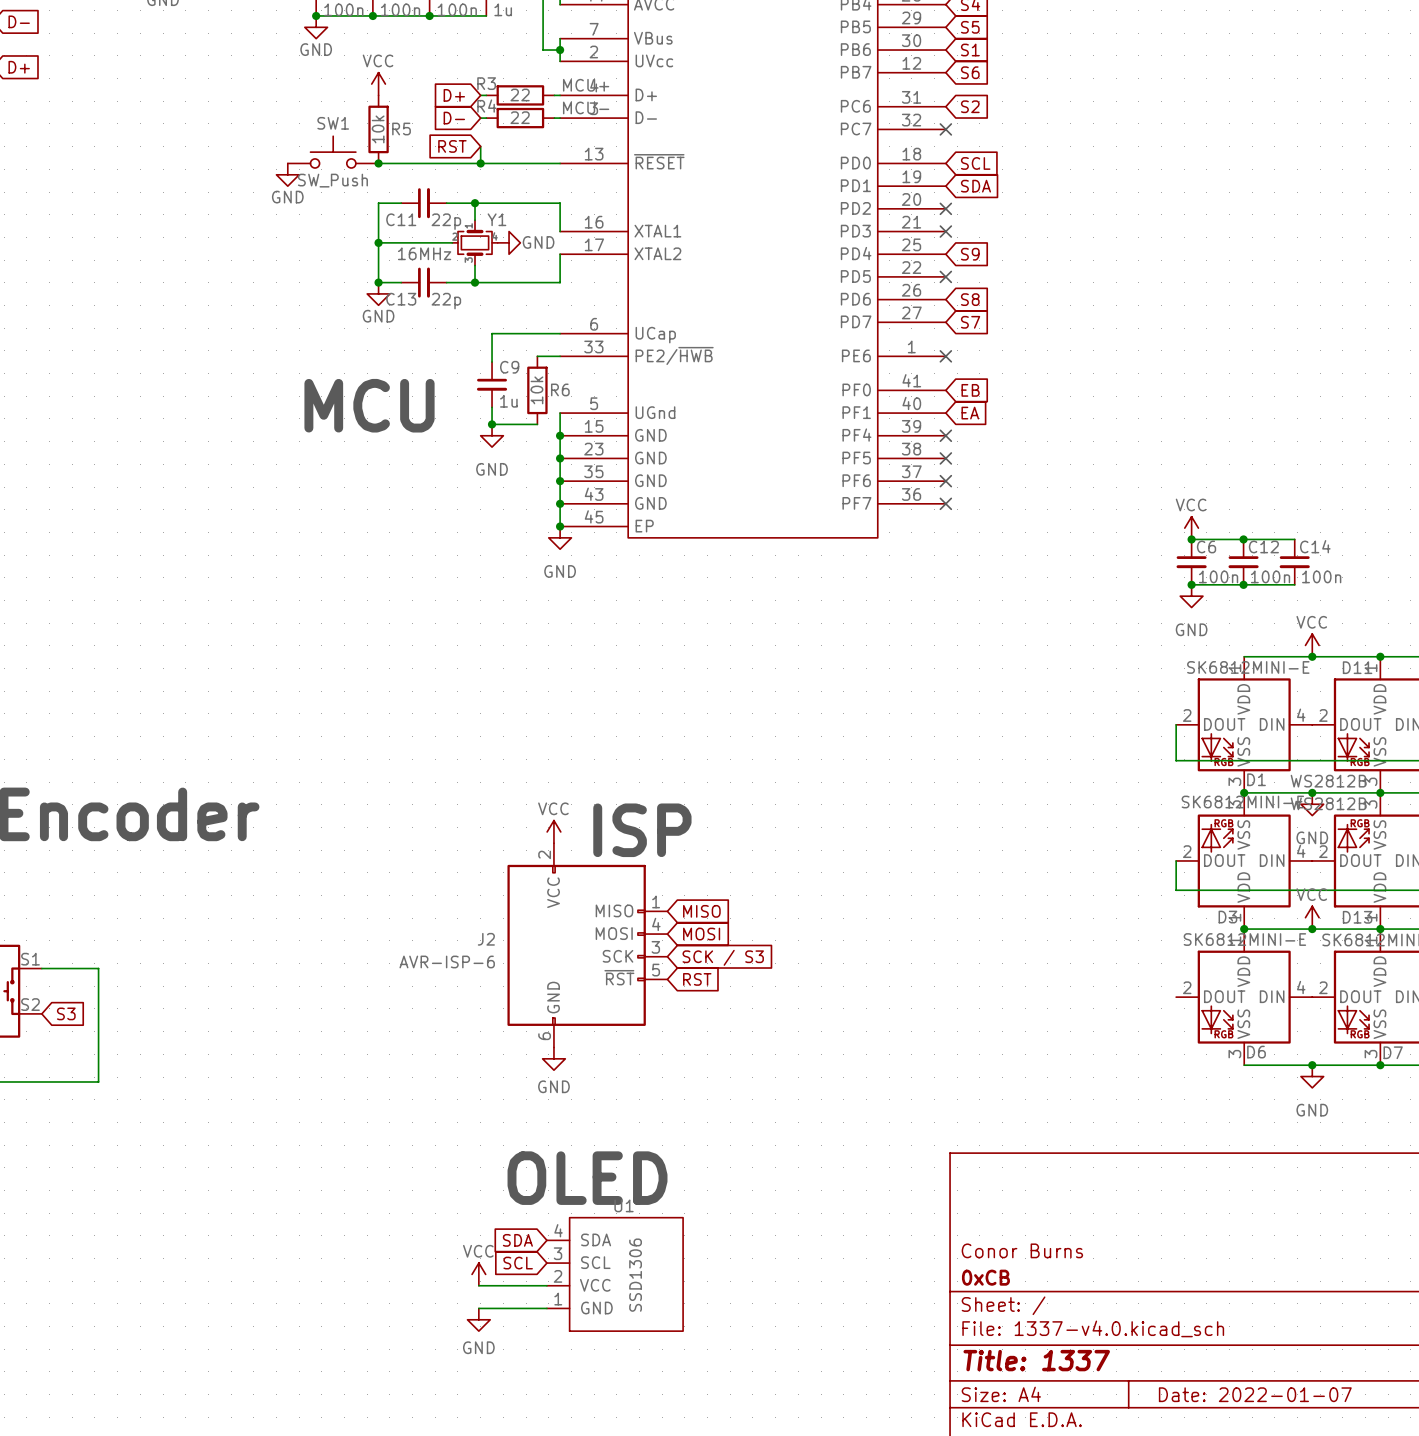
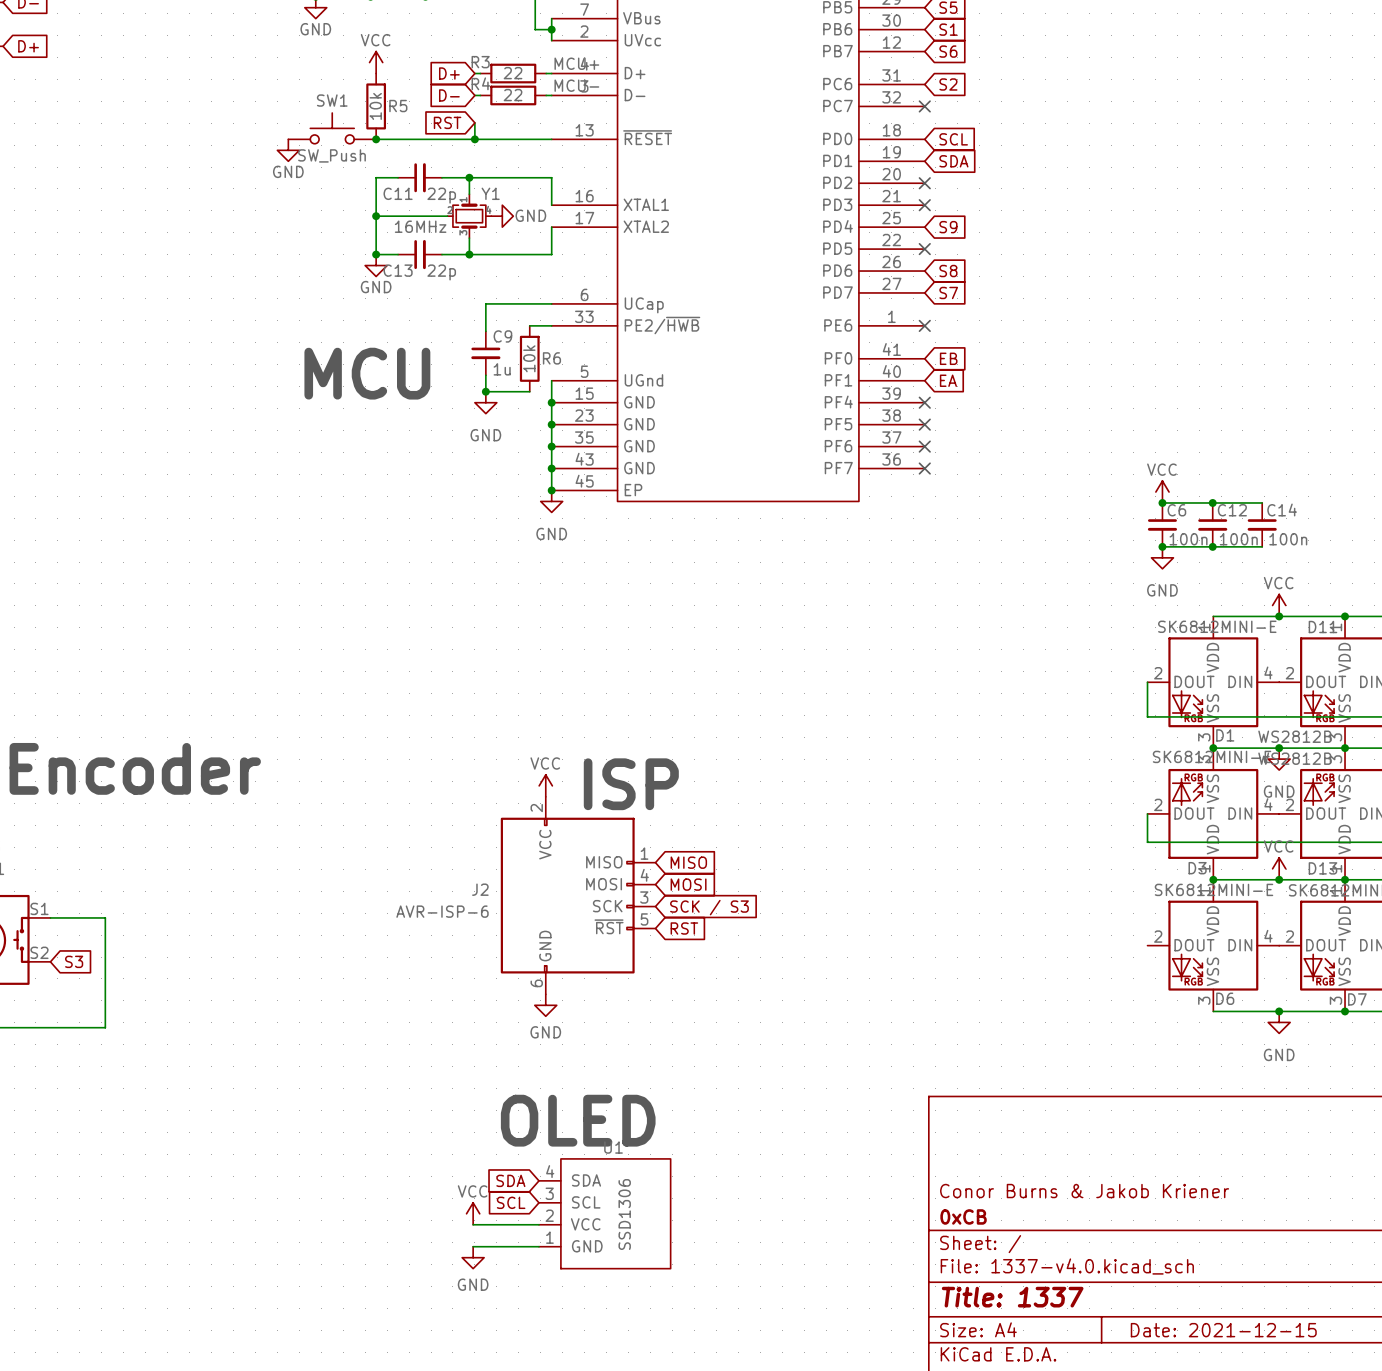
title block: Conor Burns (1022, 1250) -> Conor Burns & Jakob Kriener (1084, 1191)
title block: Date: 2022-01-07 (1255, 1394) -> Date: 2021-12-15 (1223, 1330)

